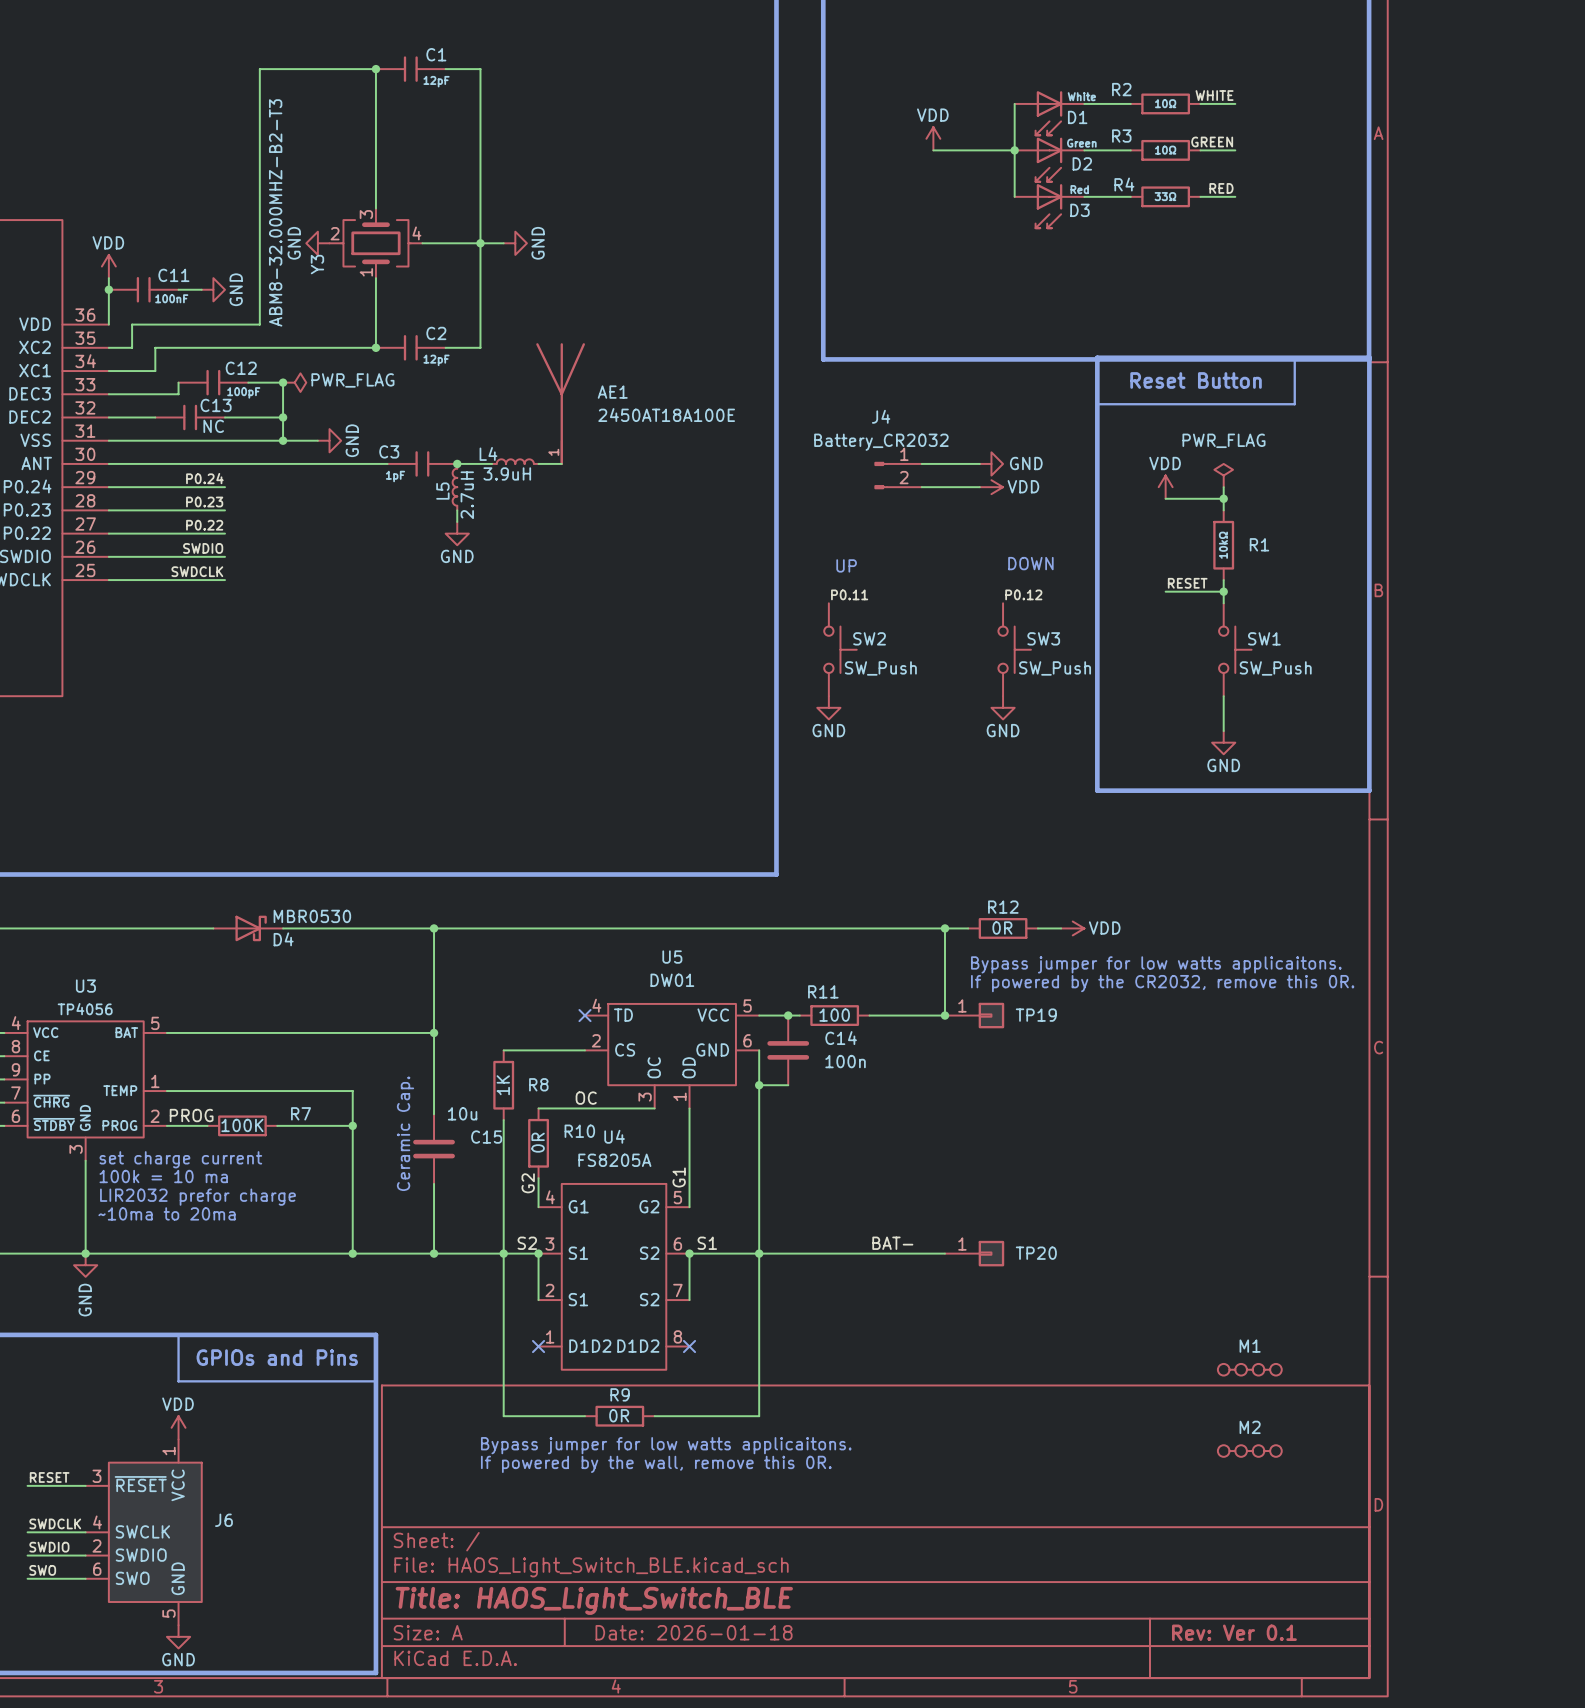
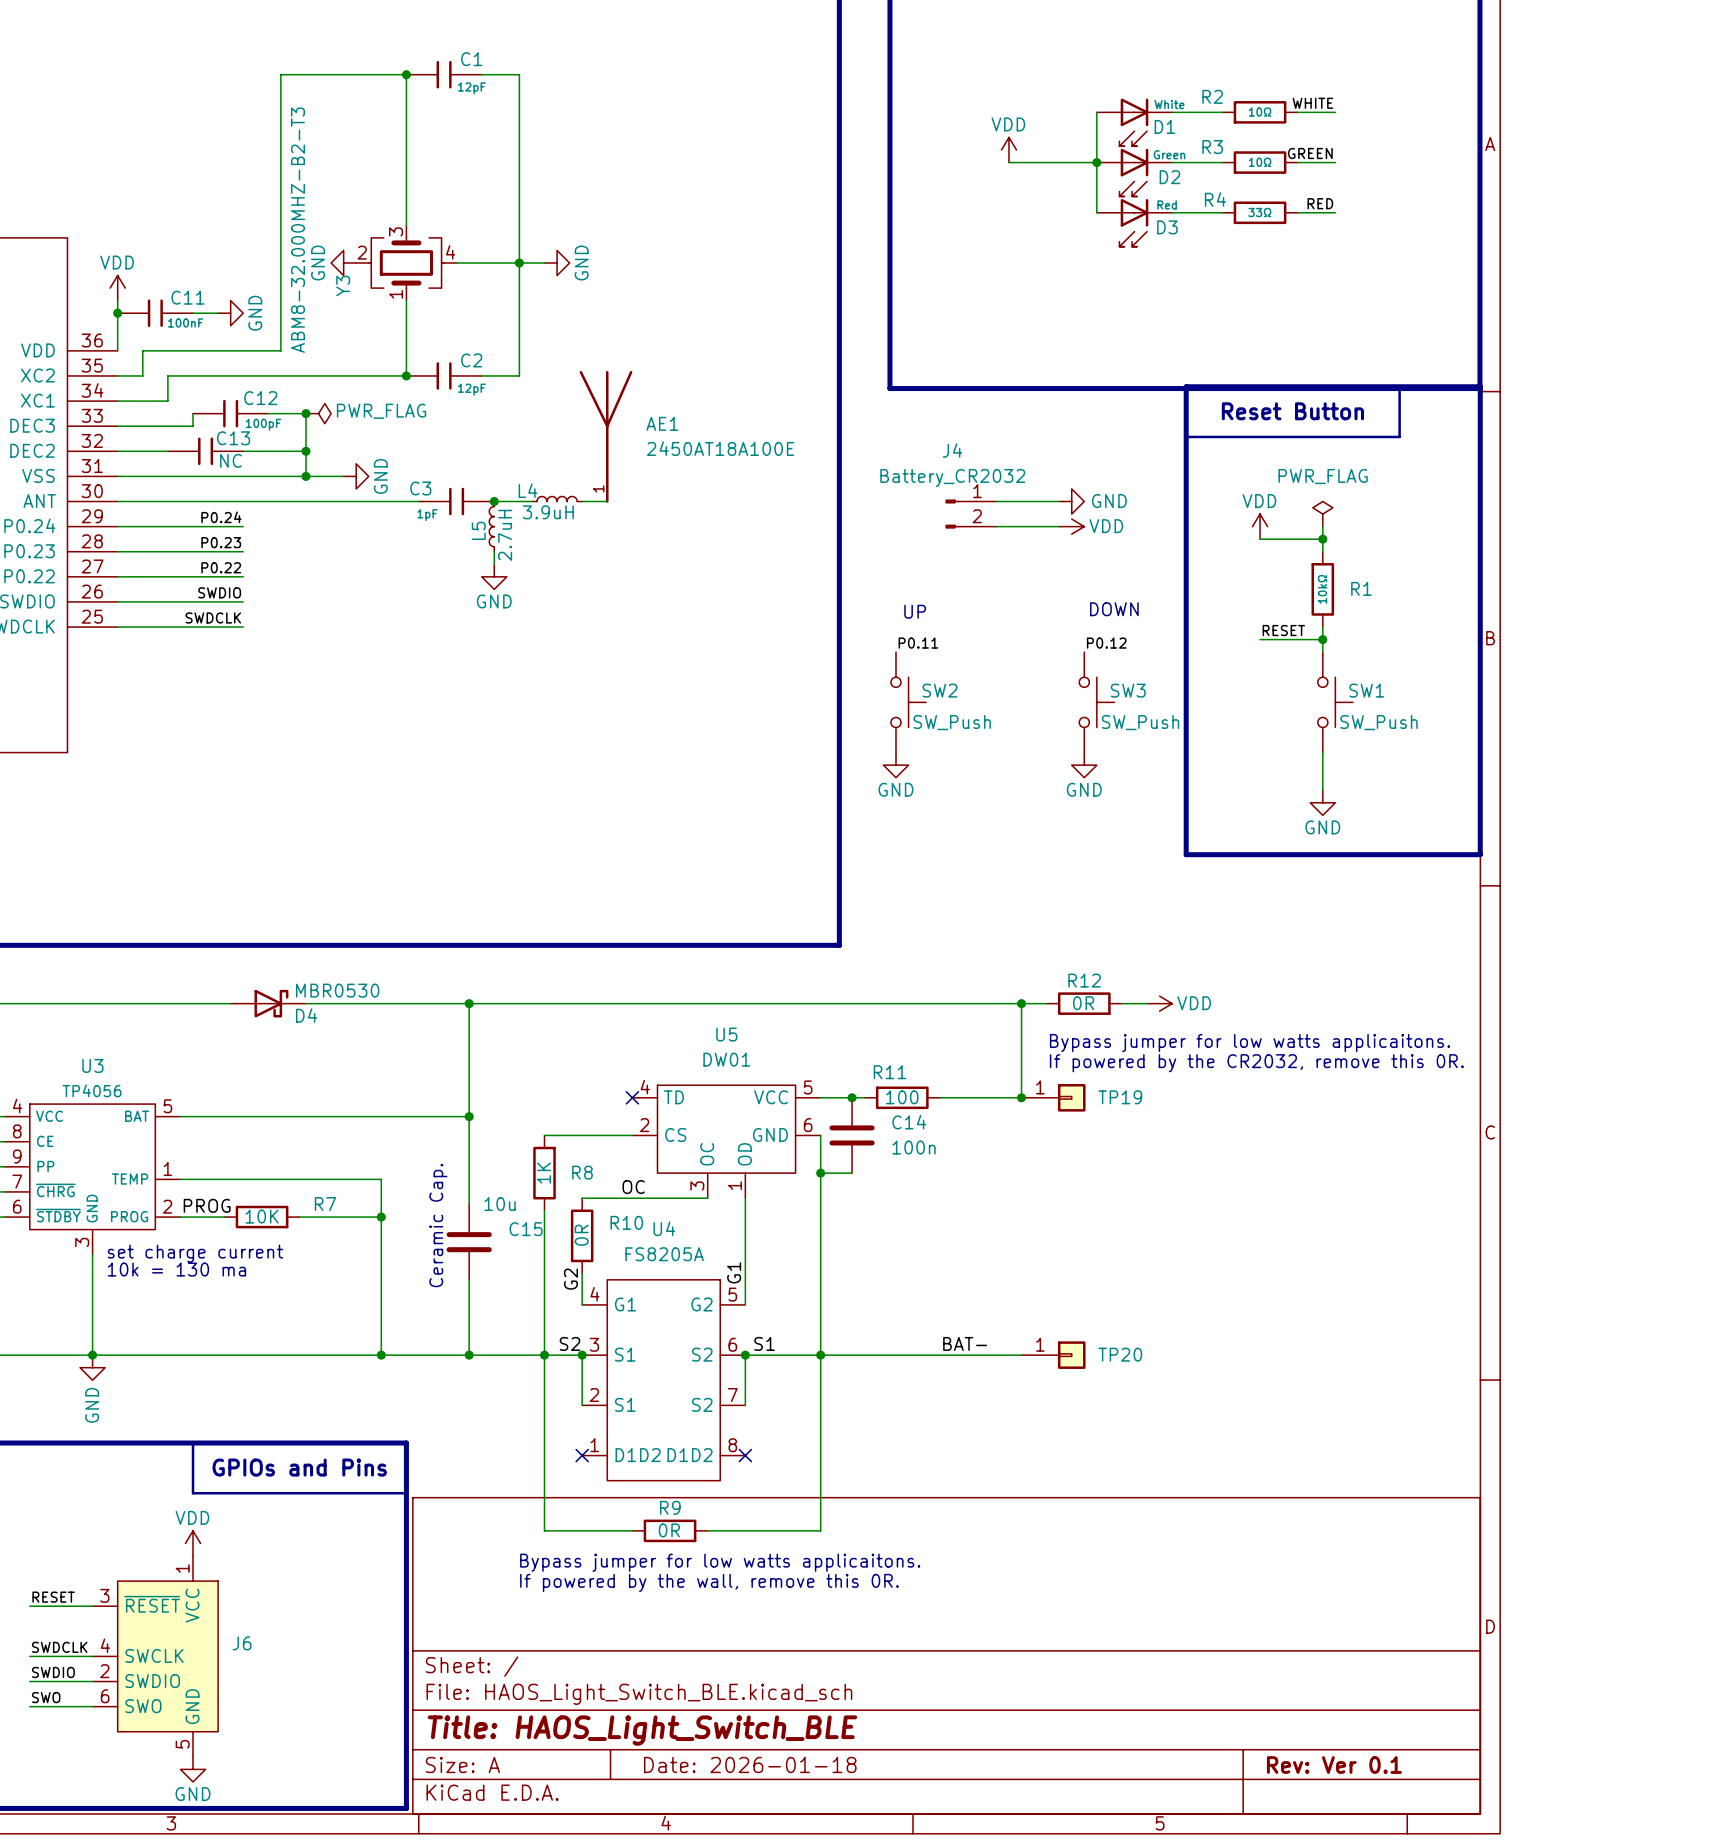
R7 value: 100K (242, 1125) -> 10K (262, 1216)
text: 100k = 10 ma (163, 1176) -> 10k = 130 ma (176, 1269)
text: LIR2032 prefor charge (197, 1197) -> none
text: ~10ma to 20ma (167, 1213) -> none
M1: (1249, 1369) -> none
M2: (1249, 1451) -> none

